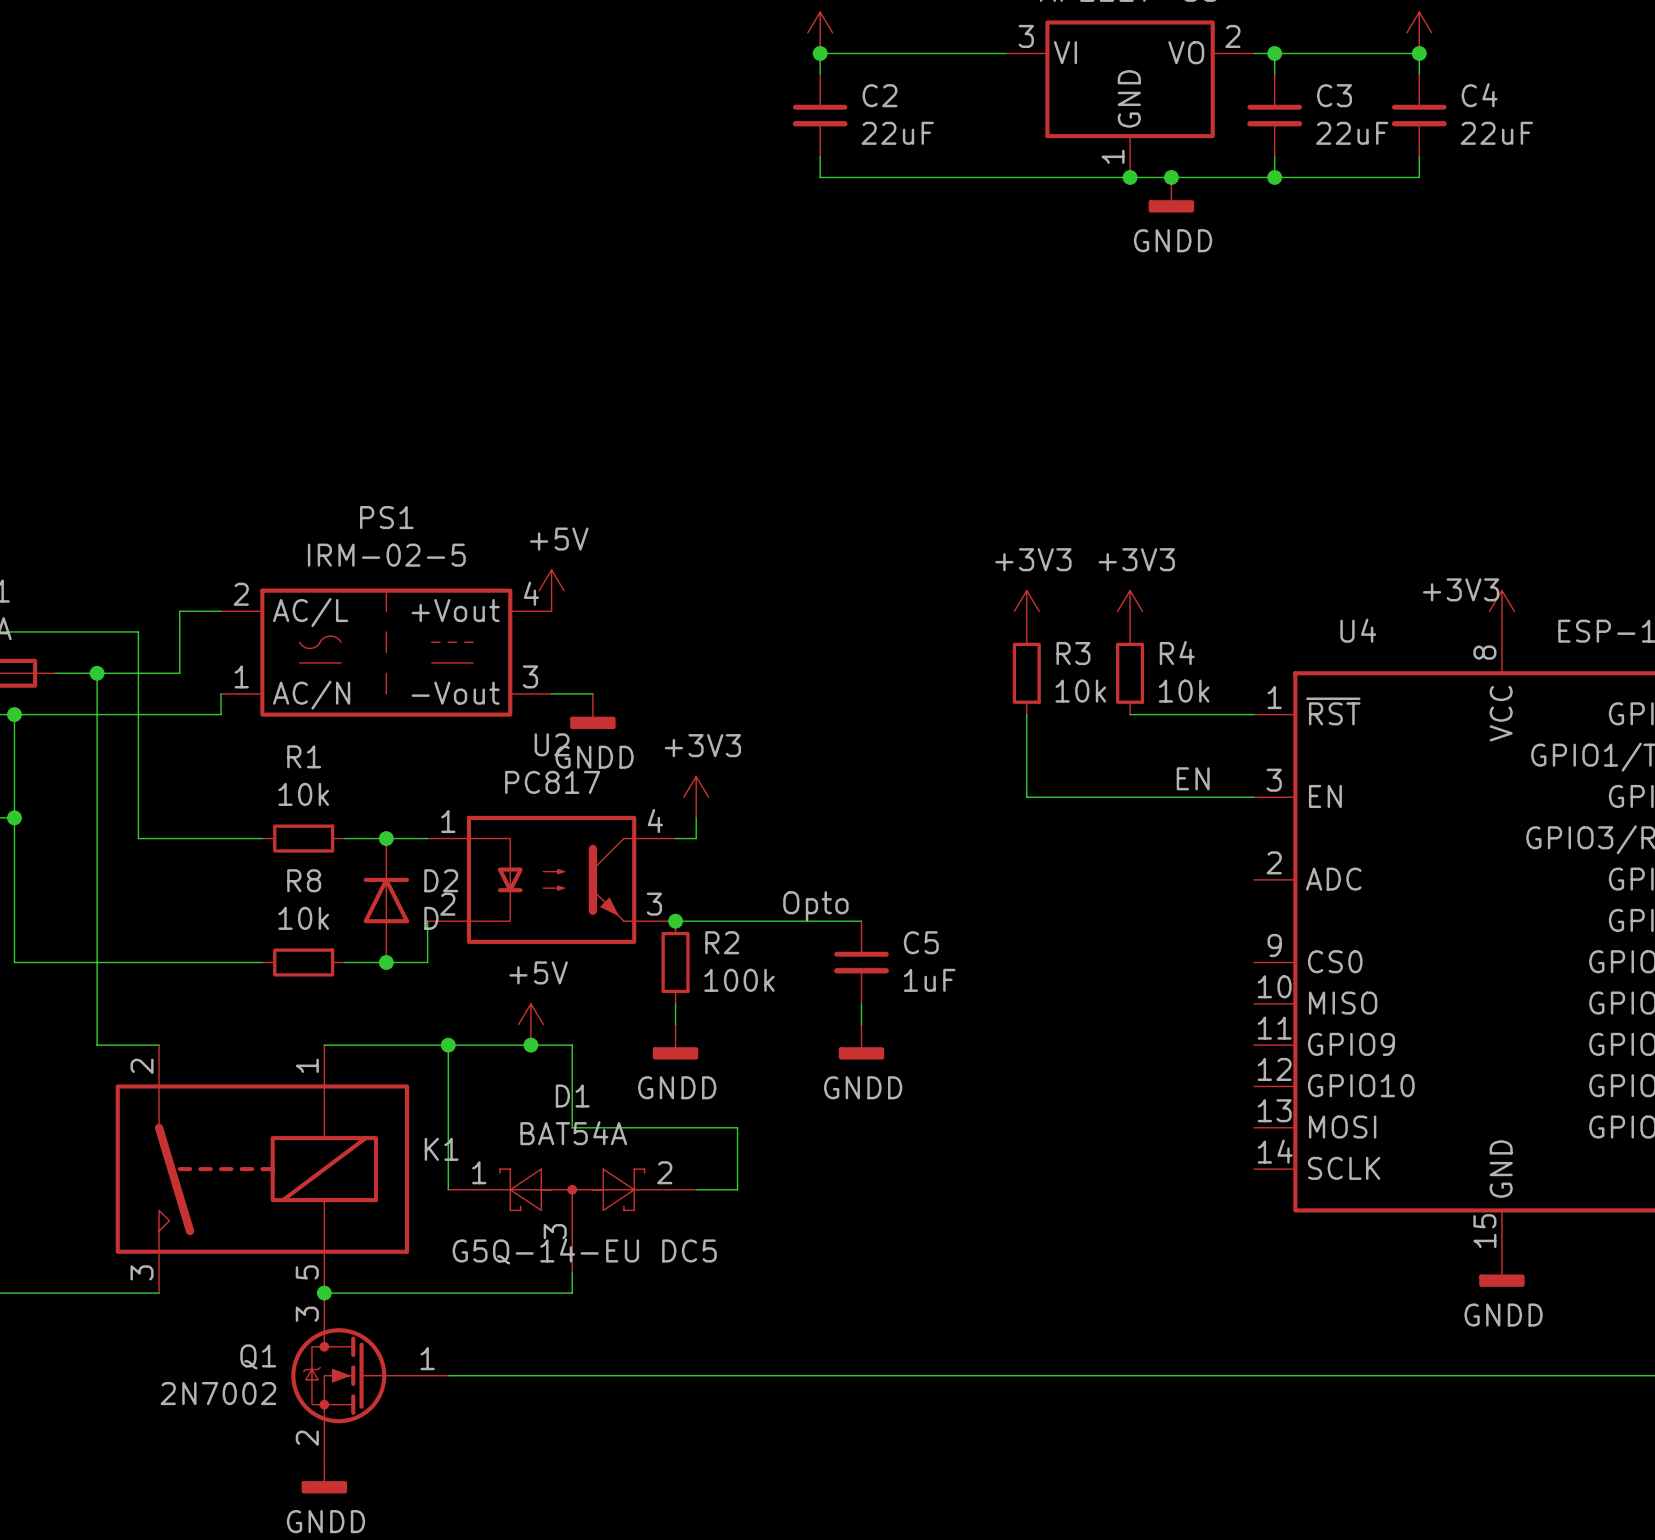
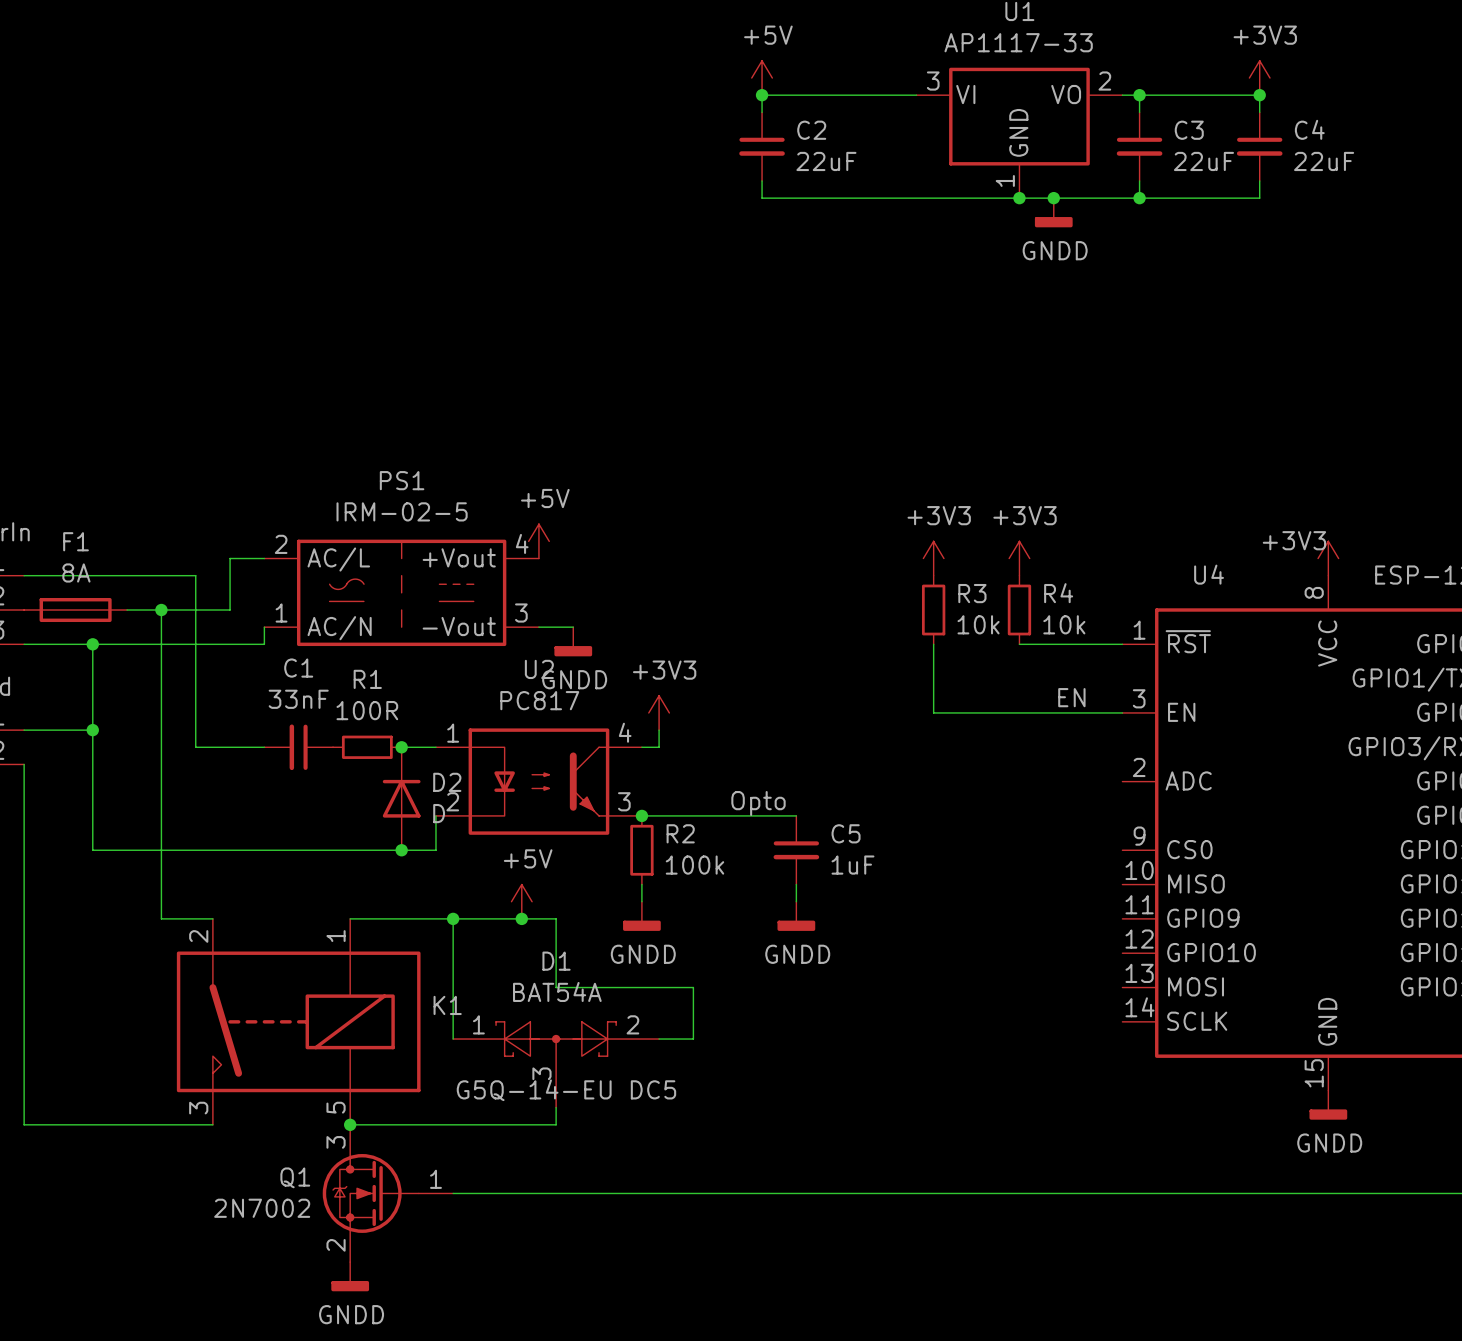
R1 value: 10k (303, 794) -> 100R (367, 710)
C1: none -> 33nF (298, 747)
R1 position: (303, 838) -> (367, 747)
wire: (345, 838) (386, 838) -> none
wire: none -> (298, 850) (367, 850)
R8: 10k (303, 962) -> none

